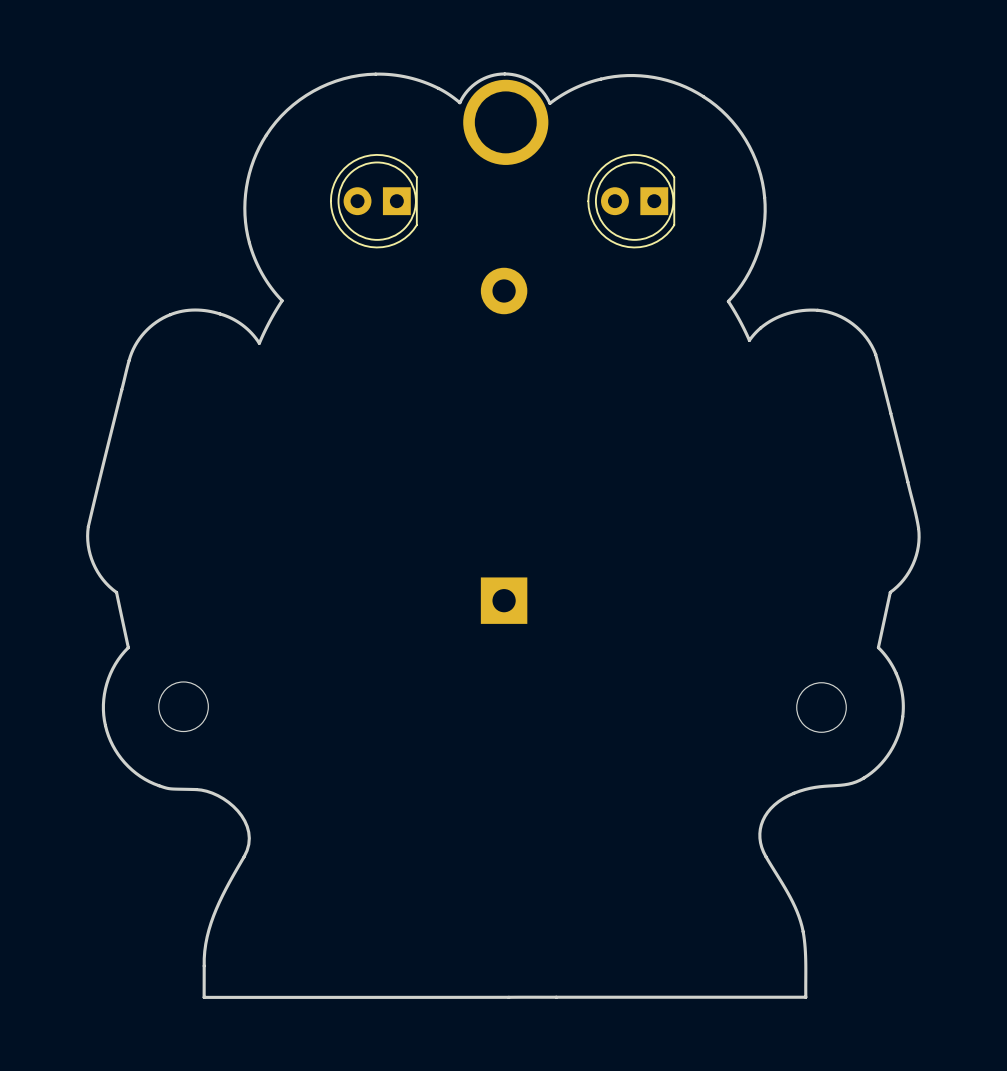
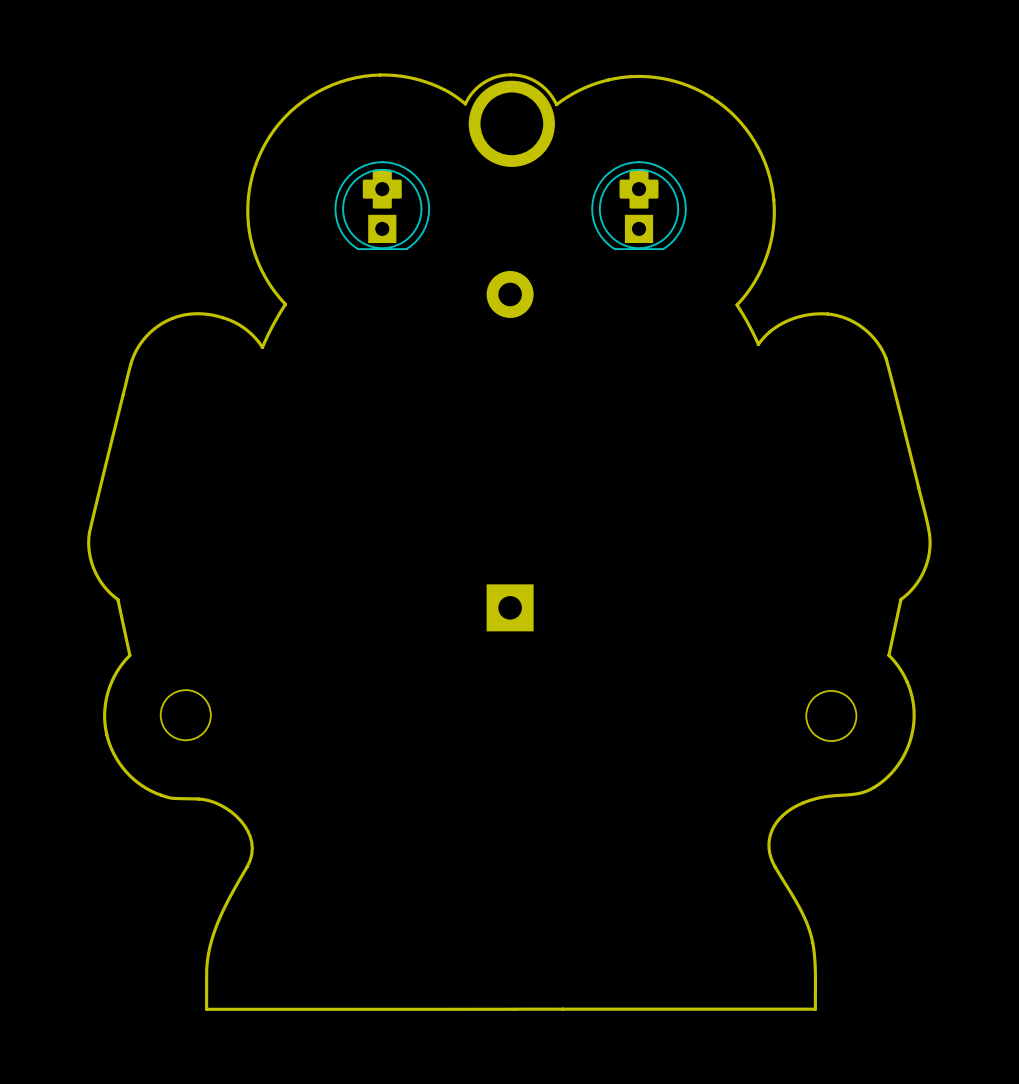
part footprint: [329, 153, 418, 249] -> [334, 161, 431, 251]
part footprint: [587, 153, 676, 249] -> [591, 161, 687, 251]

